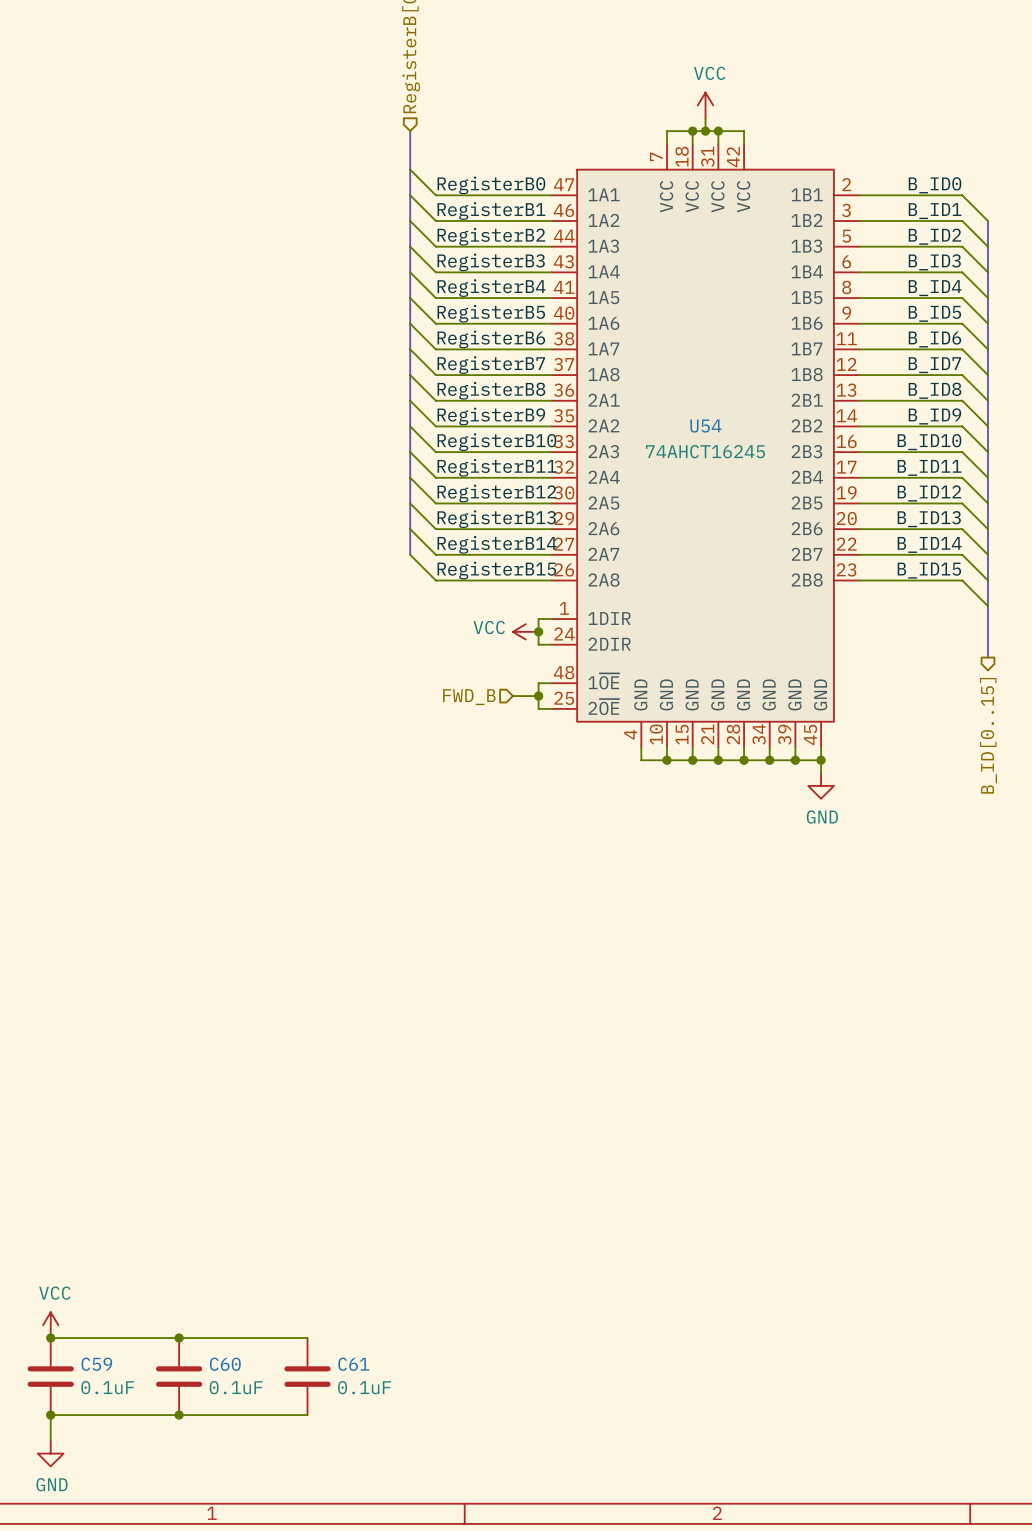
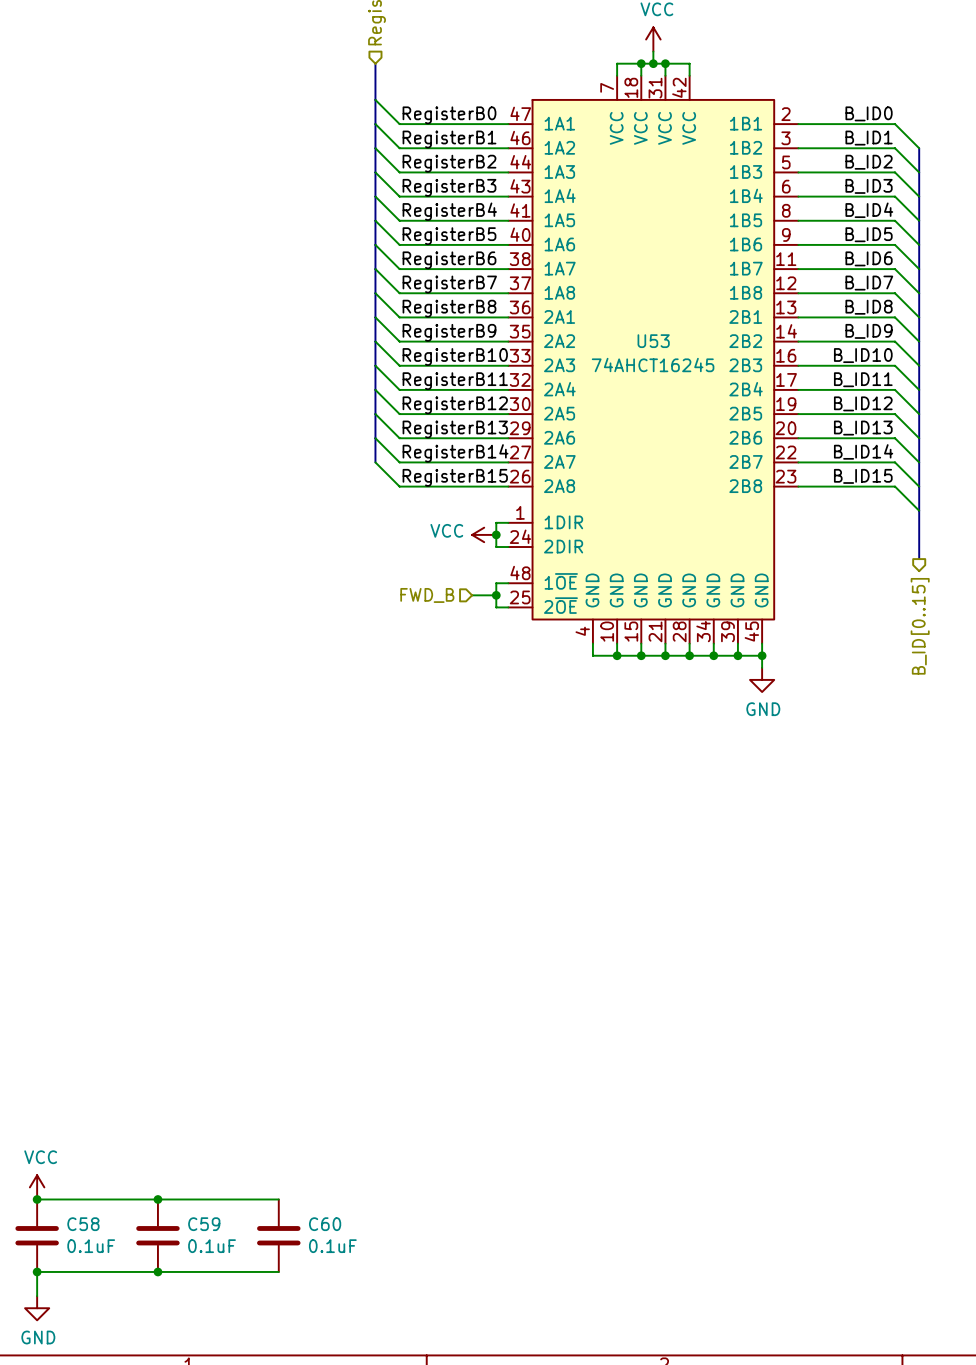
U54 name: U54 (705, 426) -> U53 (653, 341)
C59 name: C59 (96, 1364) -> C58 (83, 1224)
C60 name: C60 (225, 1364) -> C59 (204, 1224)
C61 name: C61 (353, 1364) -> C60 (325, 1224)

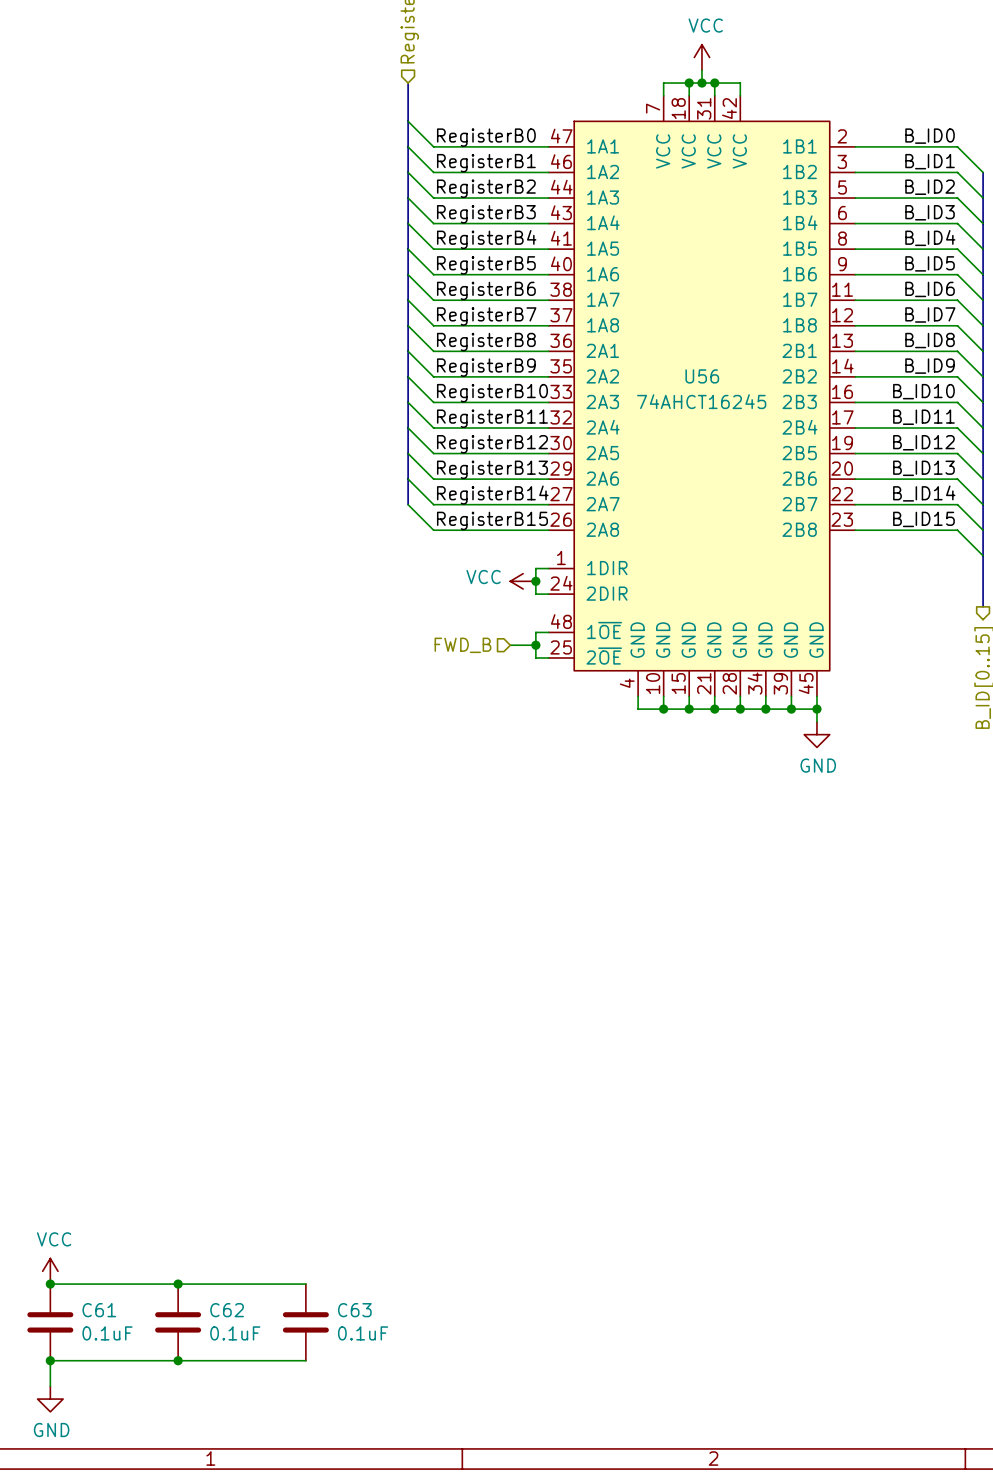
U53 name: U53 (653, 341) -> U56 (702, 376)
C58 name: C58 (83, 1224) -> C61 (99, 1310)
C59 name: C59 (204, 1224) -> C62 (227, 1310)
C60 name: C60 (325, 1224) -> C63 (354, 1310)

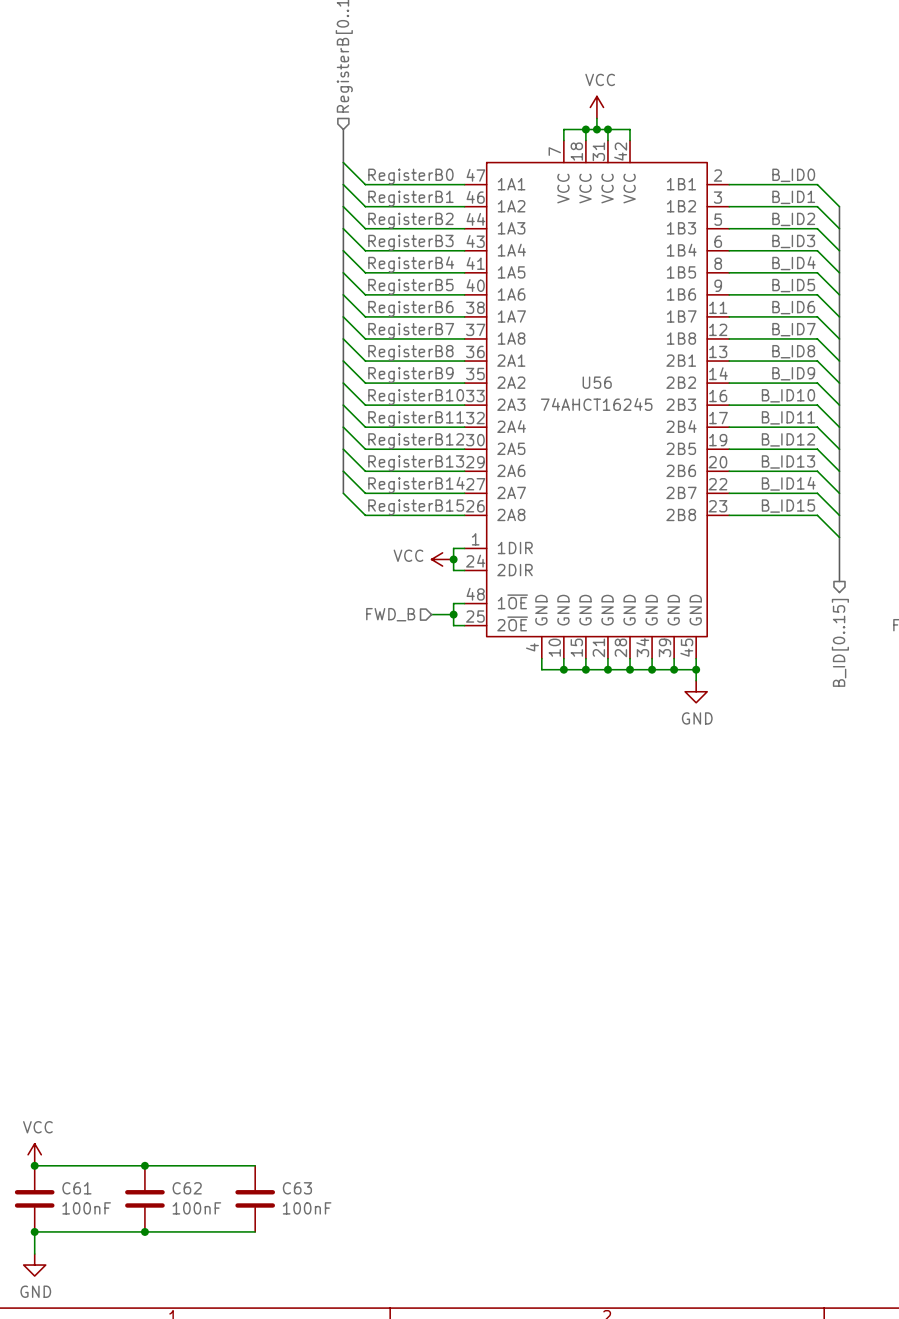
C61 value: 0.1uF (107, 1333) -> 100nF (86, 1208)
C62 value: 0.1uF (235, 1333) -> 100nF (196, 1208)
C63 value: 0.1uF (363, 1333) -> 100nF (307, 1208)

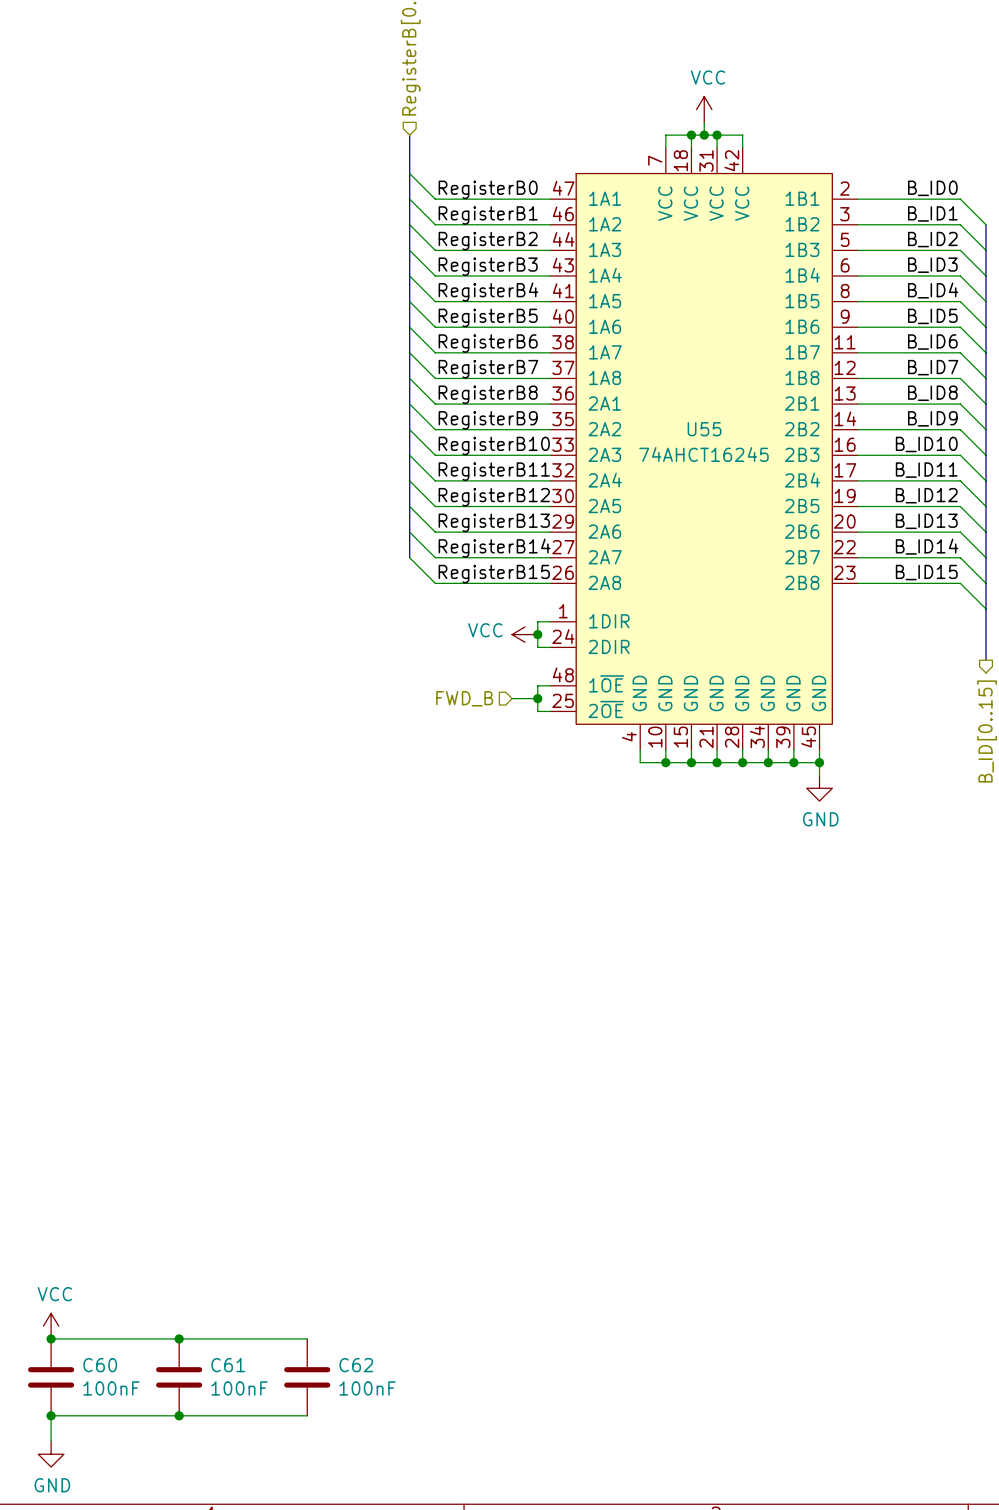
U56 name: U56 (597, 382) -> U55 (704, 429)
C61 name: C61 (76, 1188) -> C60 (100, 1365)
C62 name: C62 (187, 1188) -> C61 (228, 1365)
C63 name: C63 (297, 1188) -> C62 (356, 1365)

